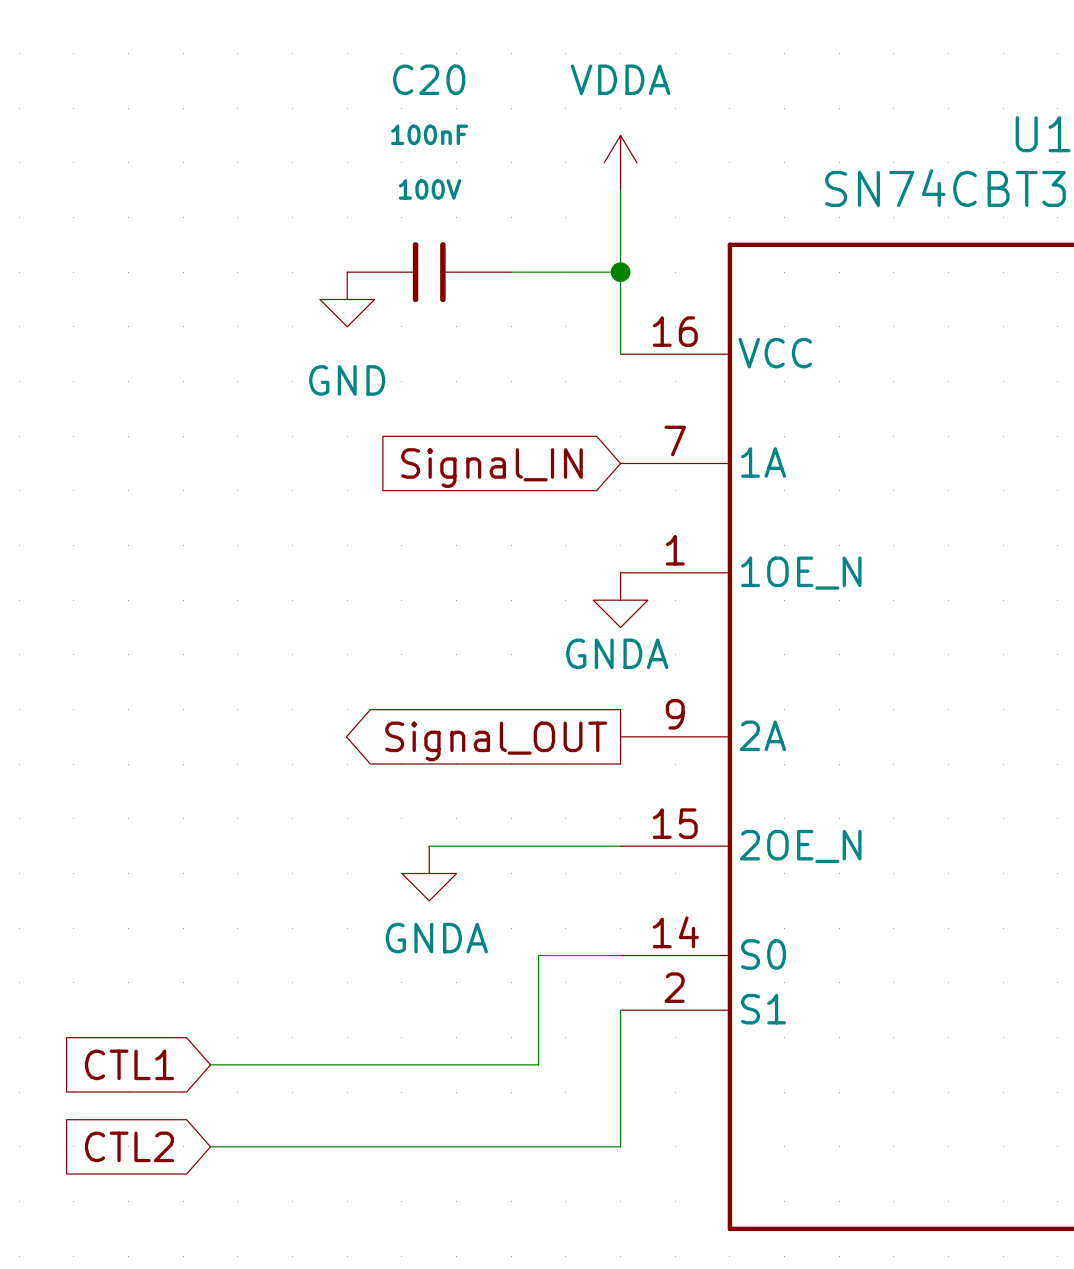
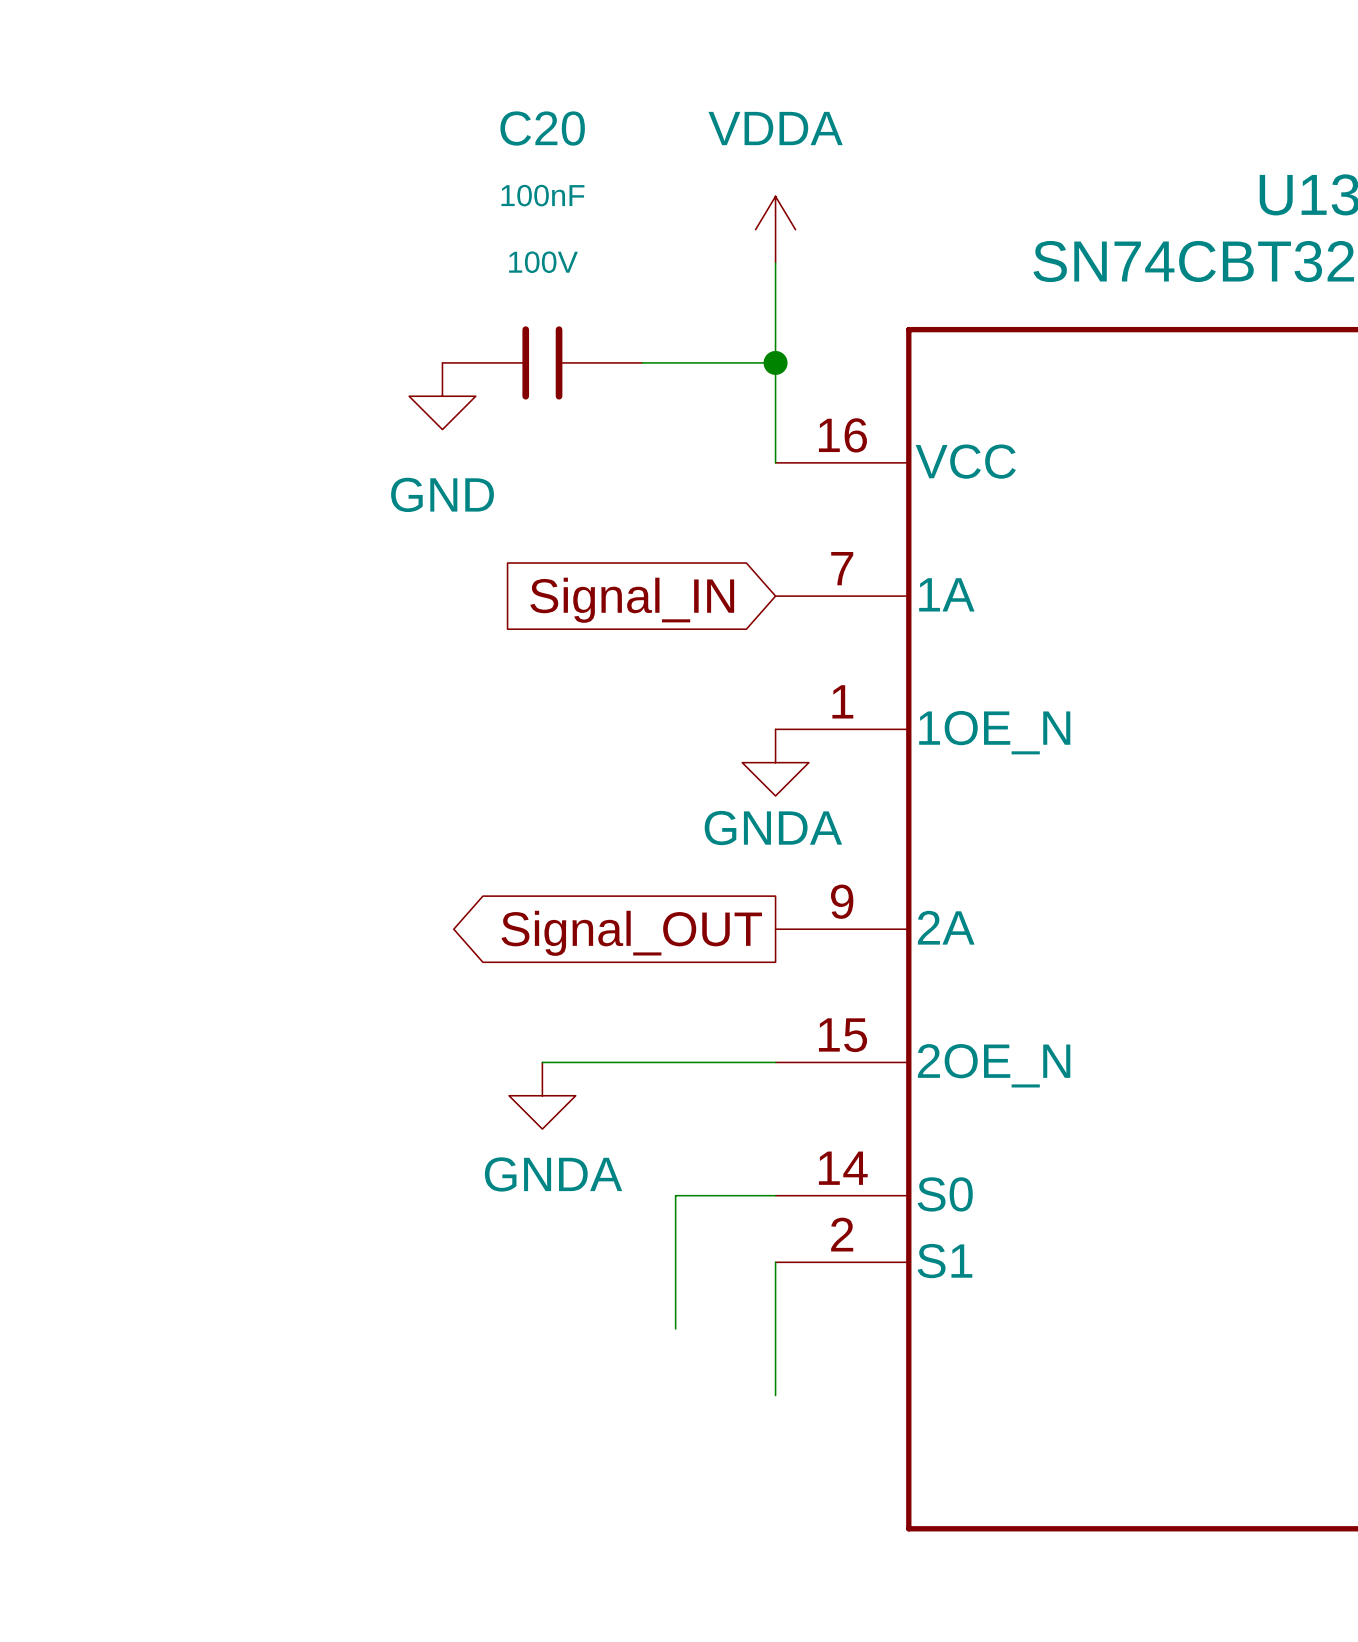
global label: CTL1 (129, 1064) -> none
wire: (210, 1064) (538, 1064) -> none
wire: (620, 1119) (620, 1146) (210, 1146) -> none
global label: CTL2 (129, 1146) -> none

